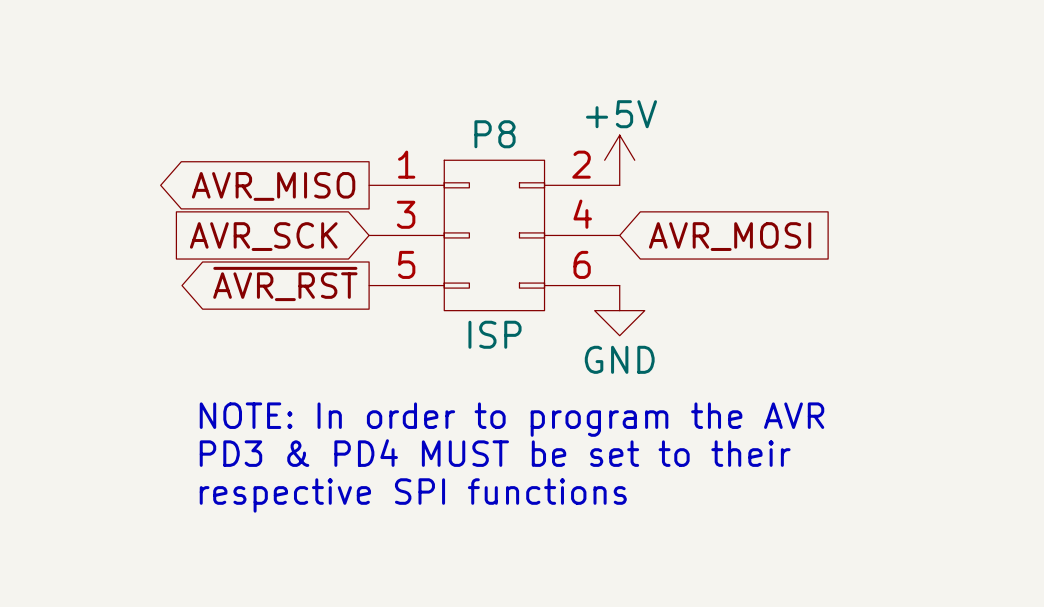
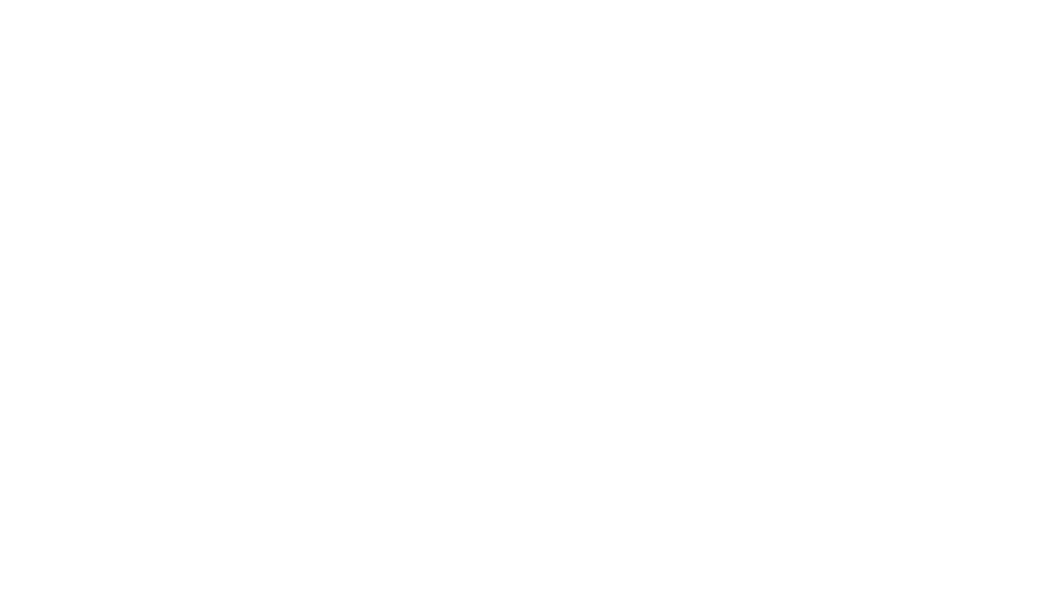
power symbol: +5V (619, 160) -> none
global label: AVR_MISO (273, 186) -> none
P8: ISP (494, 235) -> none
global label: AVR_SCK (263, 236) -> none
global label: AVR_MOSI (730, 236) -> none
global label: ~{AVR_RST} (285, 283) -> none
power symbol: GND (619, 310) -> none
text: NOTE: In order to program the AVR (511, 419) -> none
text: PD3 & PD4 MUST be set to their (495, 453) -> none
text: respective SPI functions (413, 495) -> none

